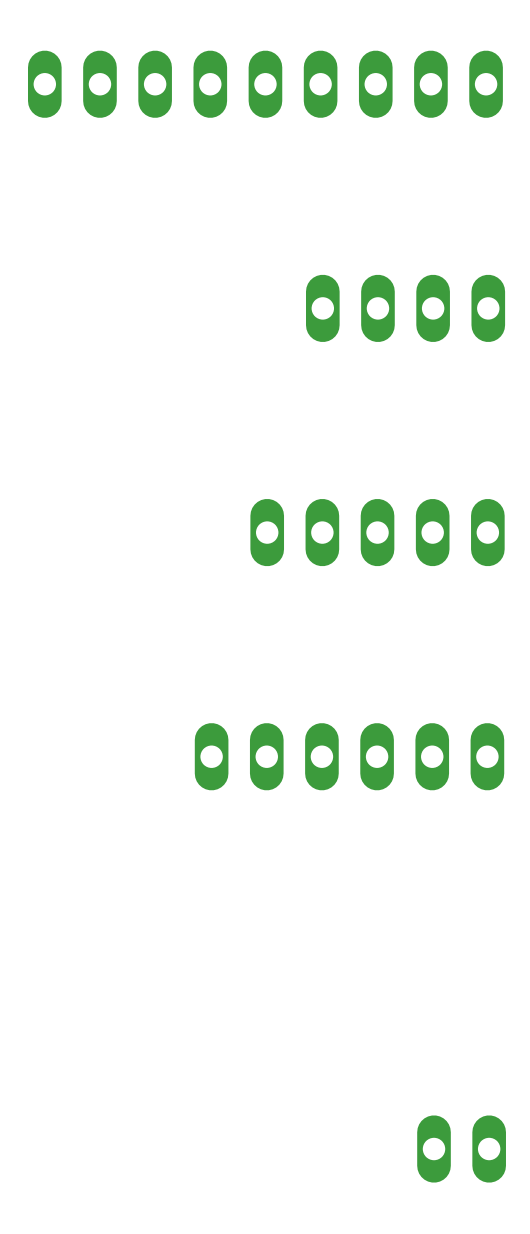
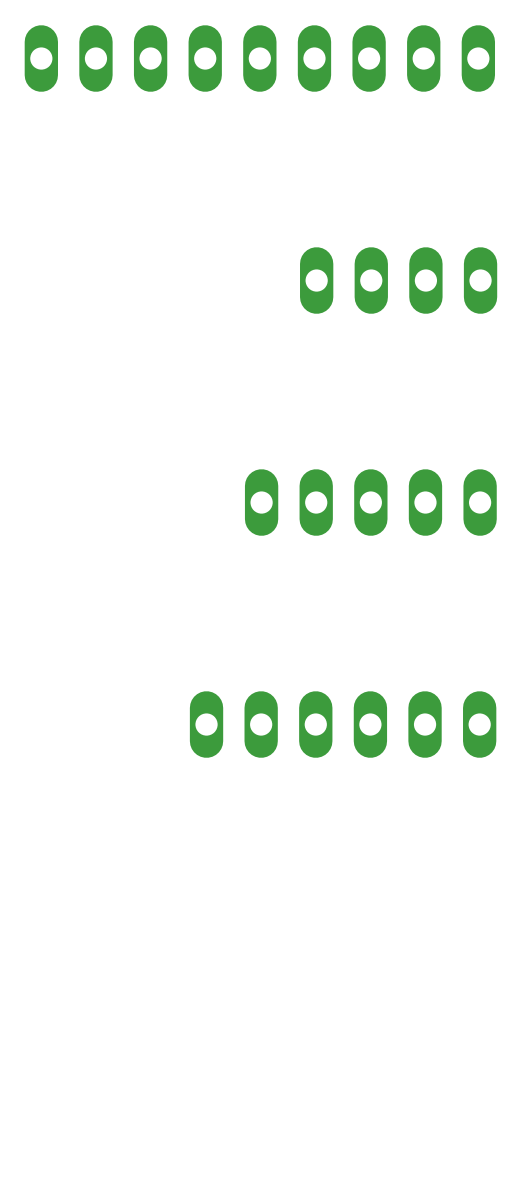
part: (461, 1149) -> none

